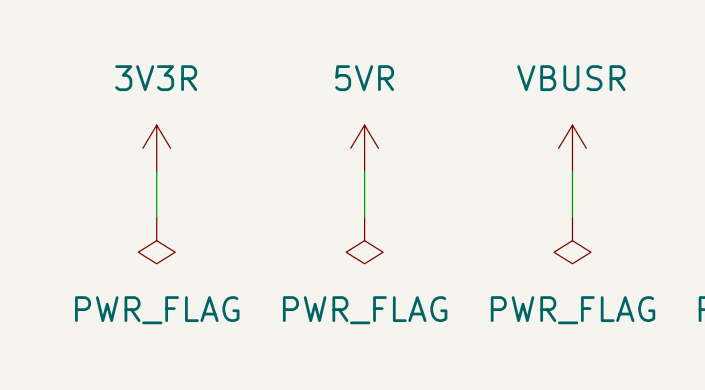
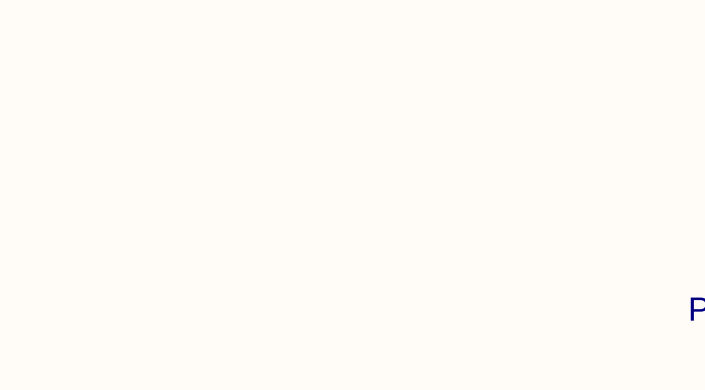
power symbol: 3V3R (156, 148) -> none
power symbol: 5VR (364, 148) -> none
power symbol: VBUSR (572, 148) -> none
wire: (156, 171) (156, 217) -> none
wire: (364, 171) (364, 217) -> none
wire: (572, 171) (572, 217) -> none
power symbol: PWR_FLAG (156, 240) -> none
power symbol: PWR_FLAG (364, 240) -> none
power symbol: PWR_FLAG (572, 240) -> none

